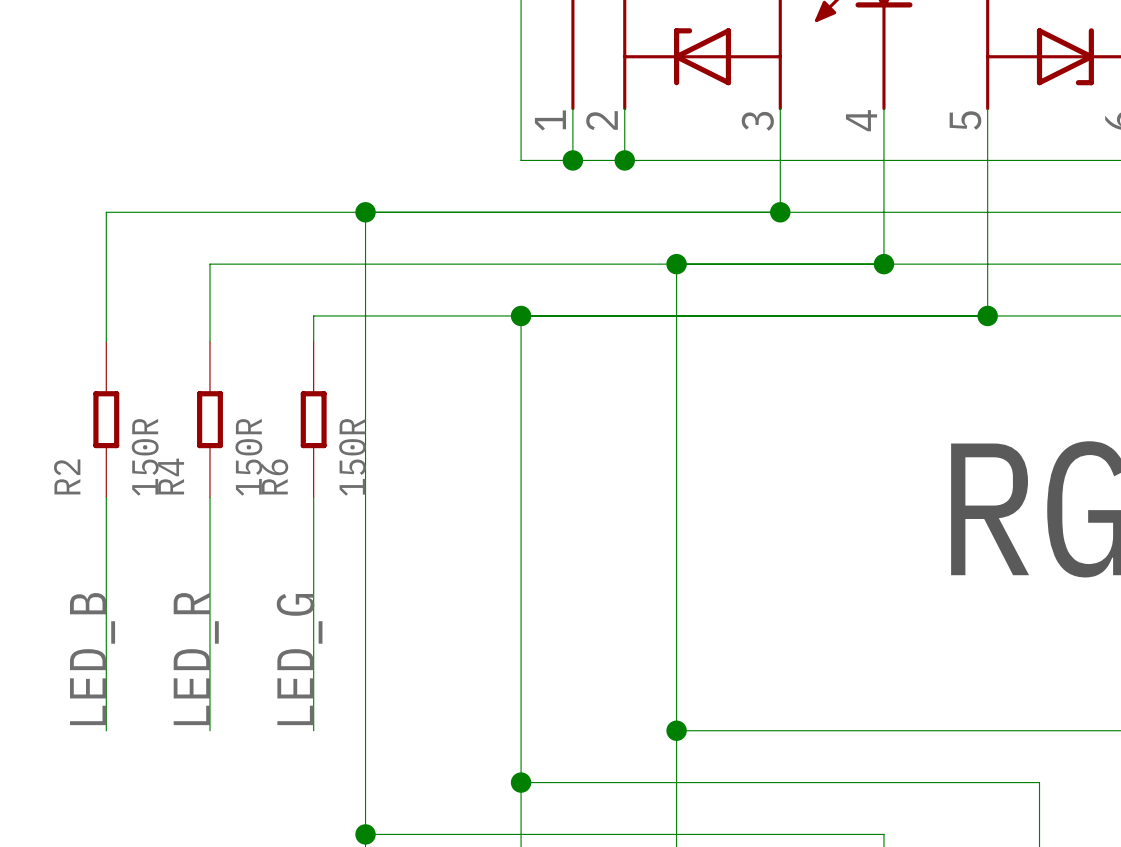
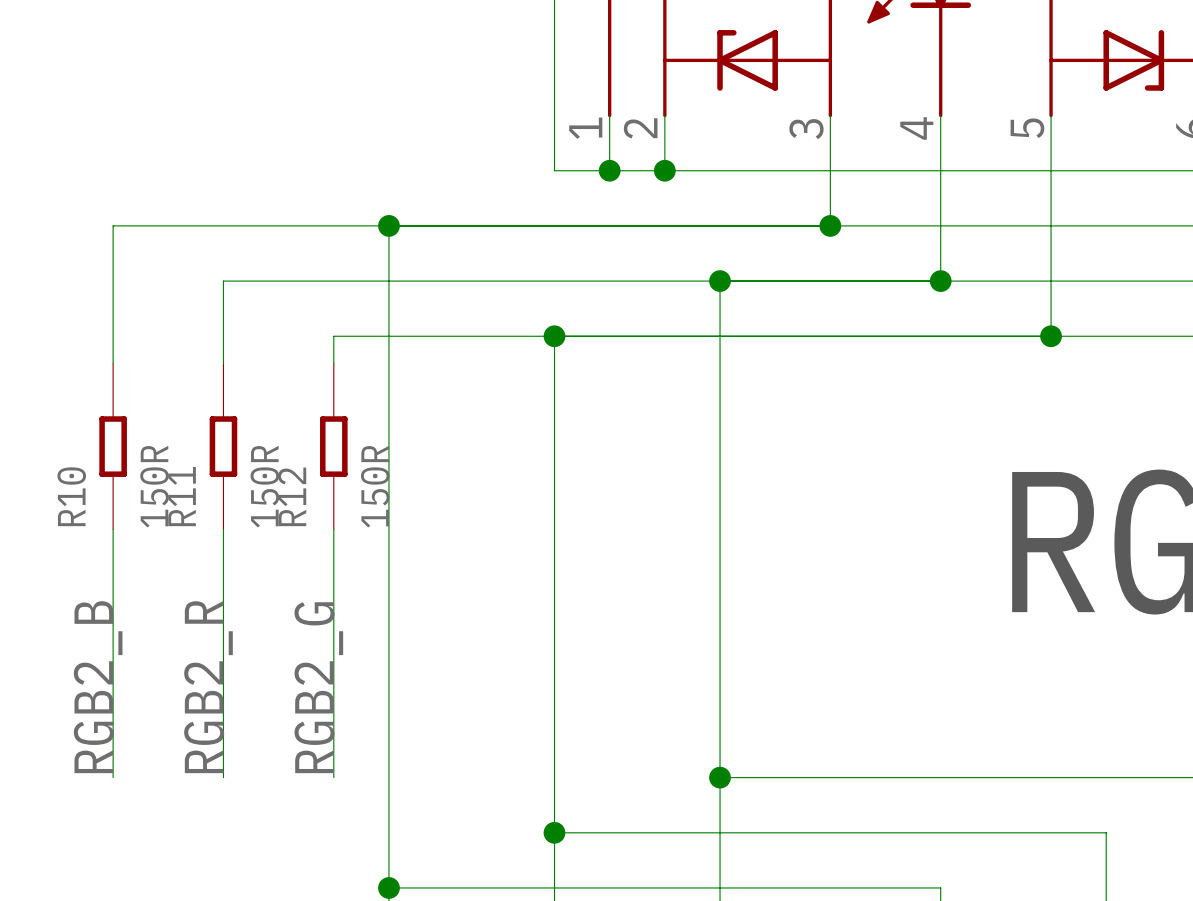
R2 name: R2 (67, 476) -> R10 (71, 496)
R4 name: R4 (171, 476) -> R11 (182, 496)
R6 name: R6 (275, 476) -> R12 (292, 496)
label: LED_R (196, 658) -> RGB2_R (208, 687)
label: LED_B (92, 659) -> RGB2_B (98, 687)
label: LED_G (299, 659) -> RGB2_G (318, 687)

